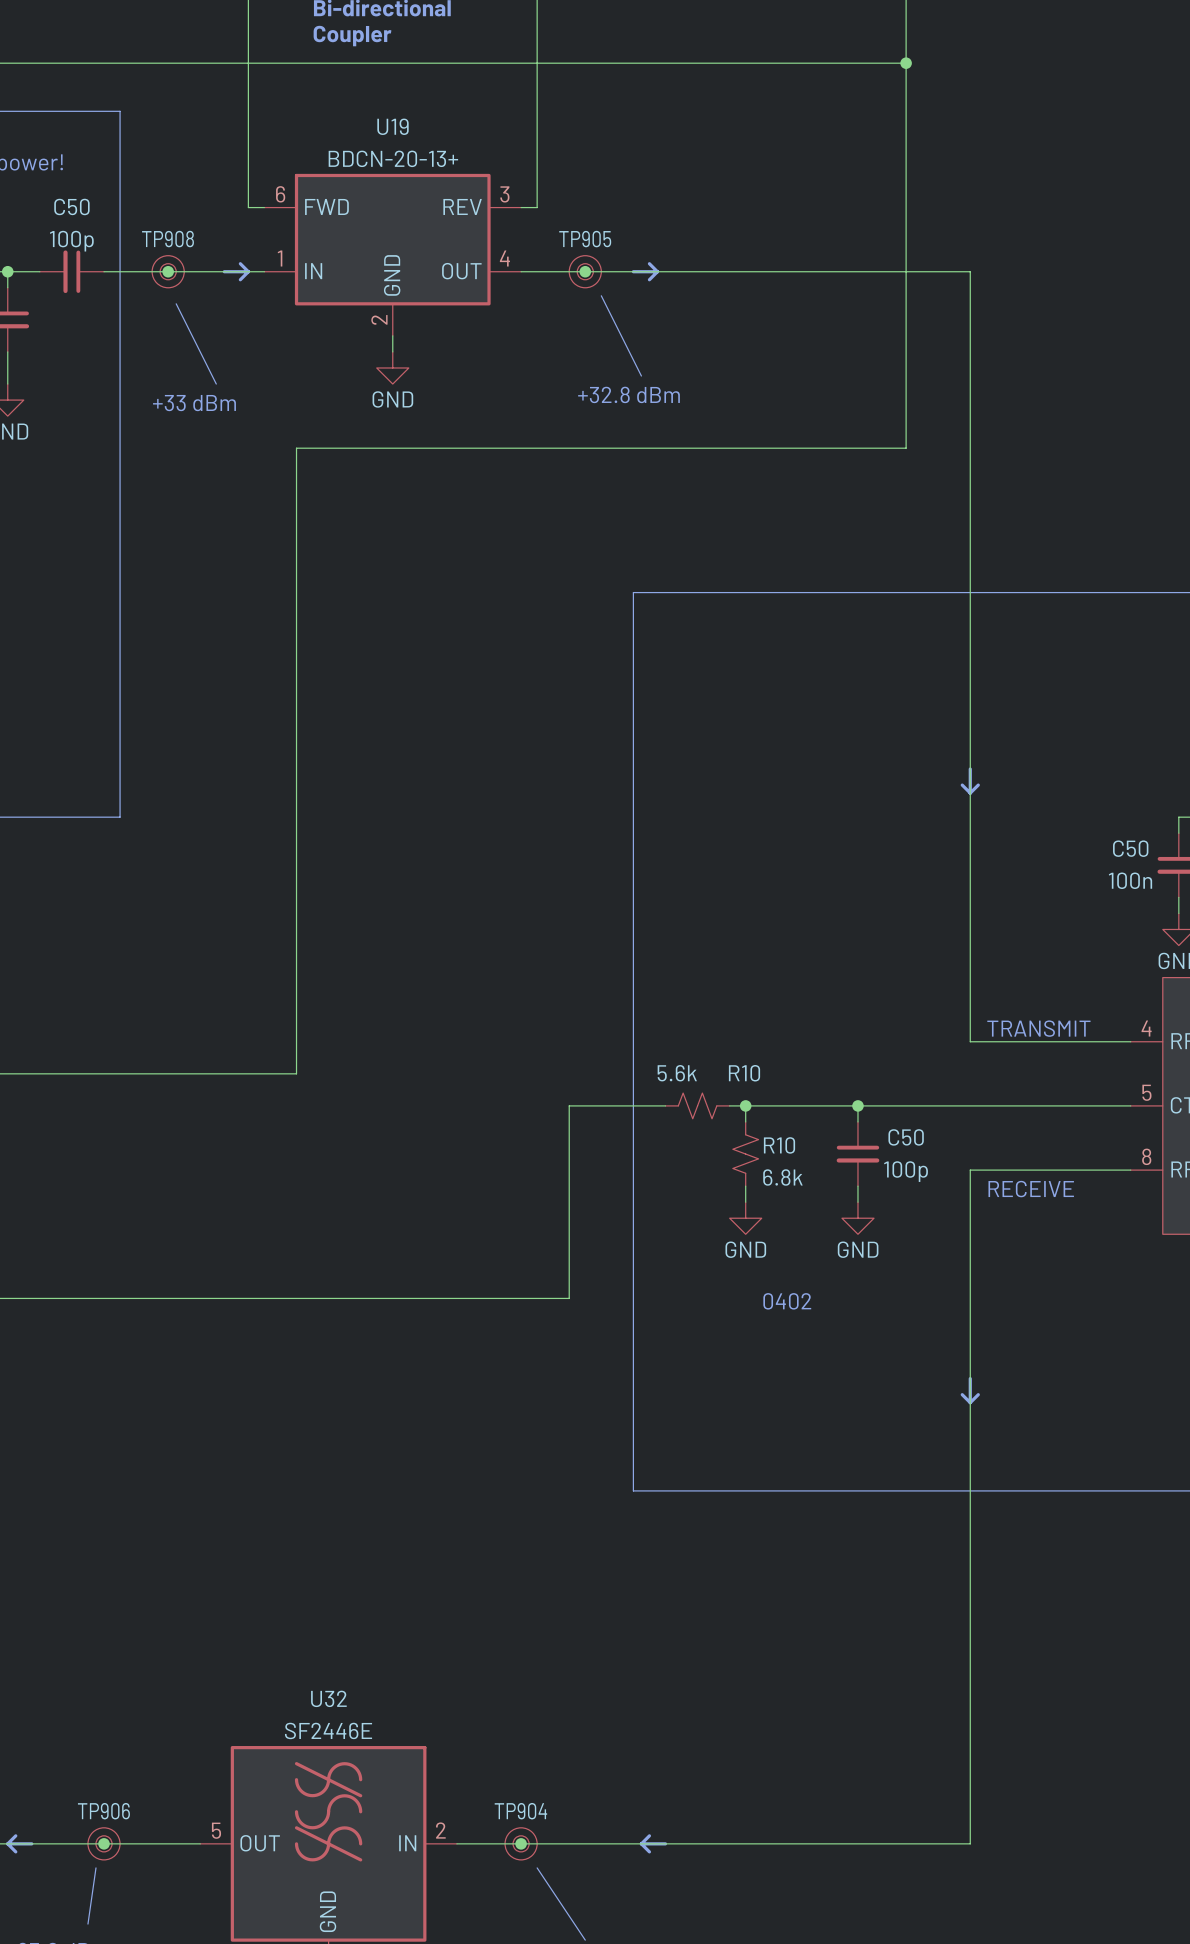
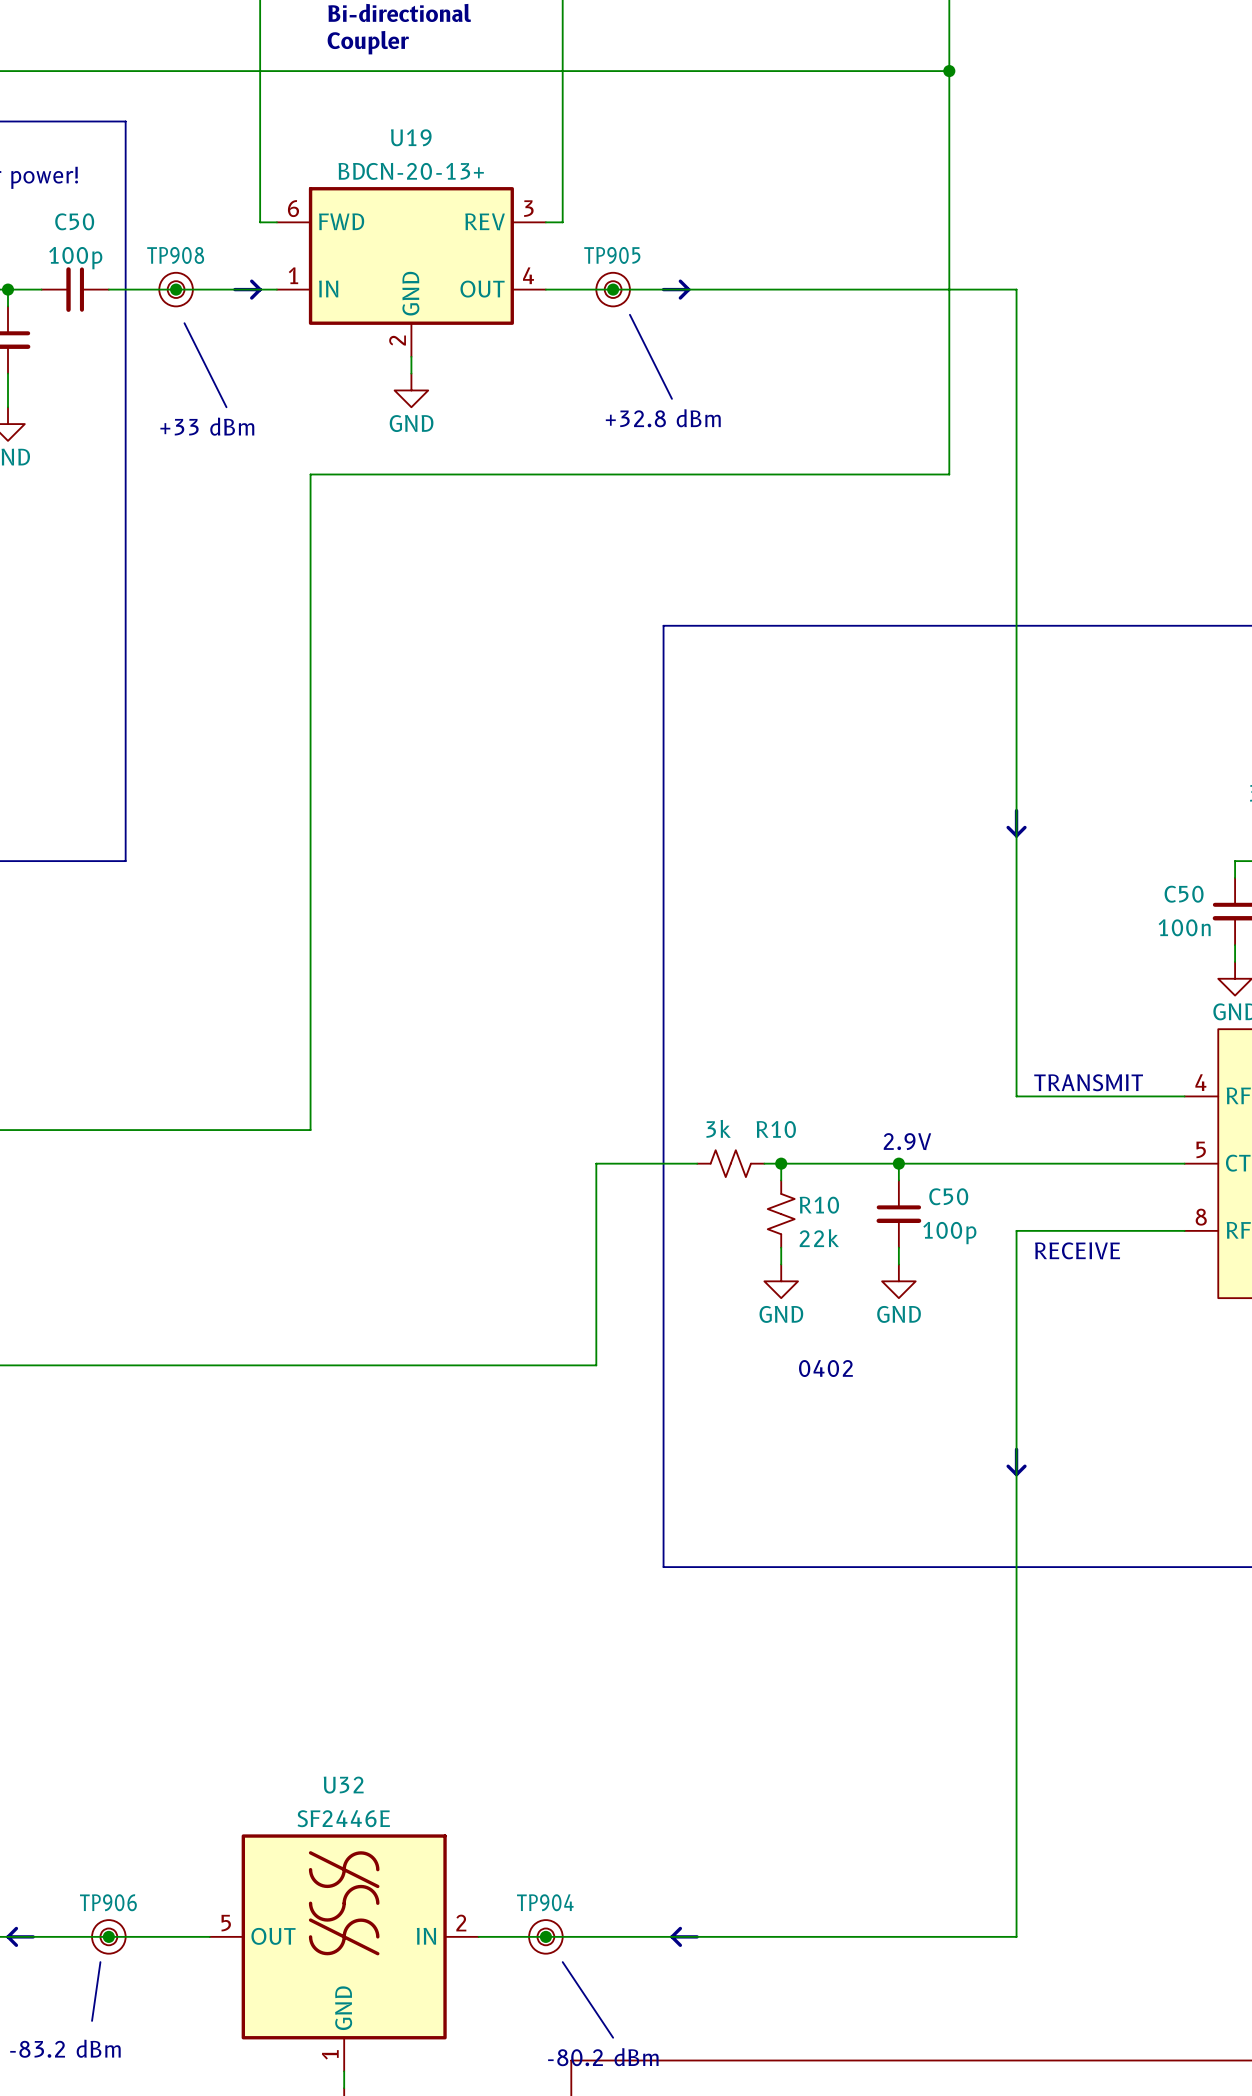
R10 value: 5.6k (677, 1073) -> 3k (718, 1128)
text: none -> 2.9V (907, 1141)
R10 value: 6.8k (782, 1177) -> 22k (819, 1238)

